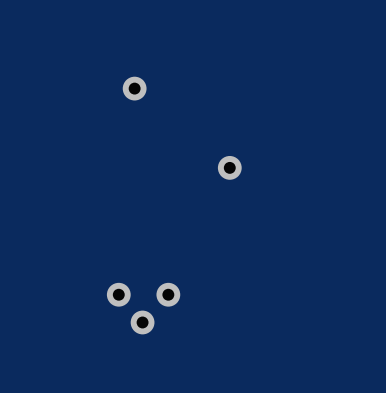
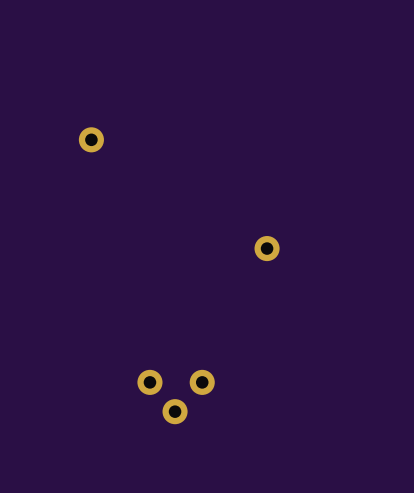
via position: (134, 88) -> (91, 139)

